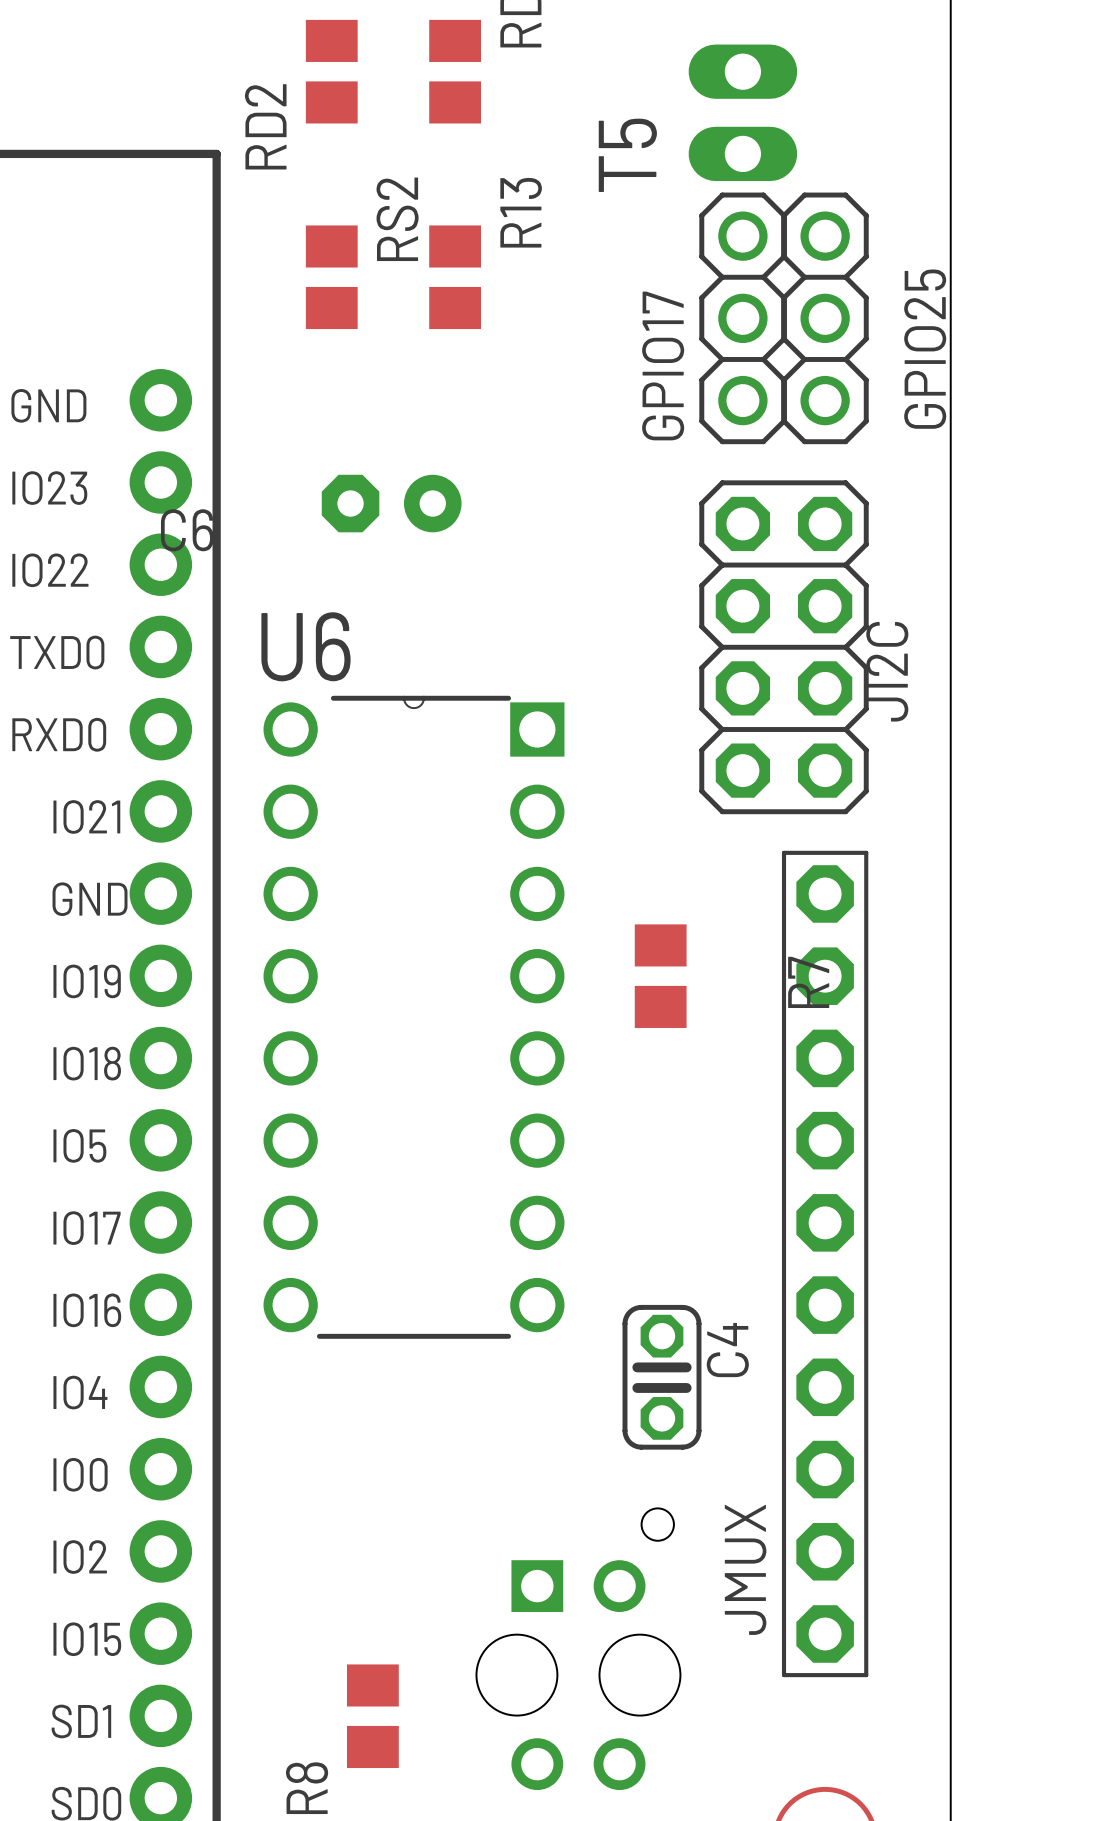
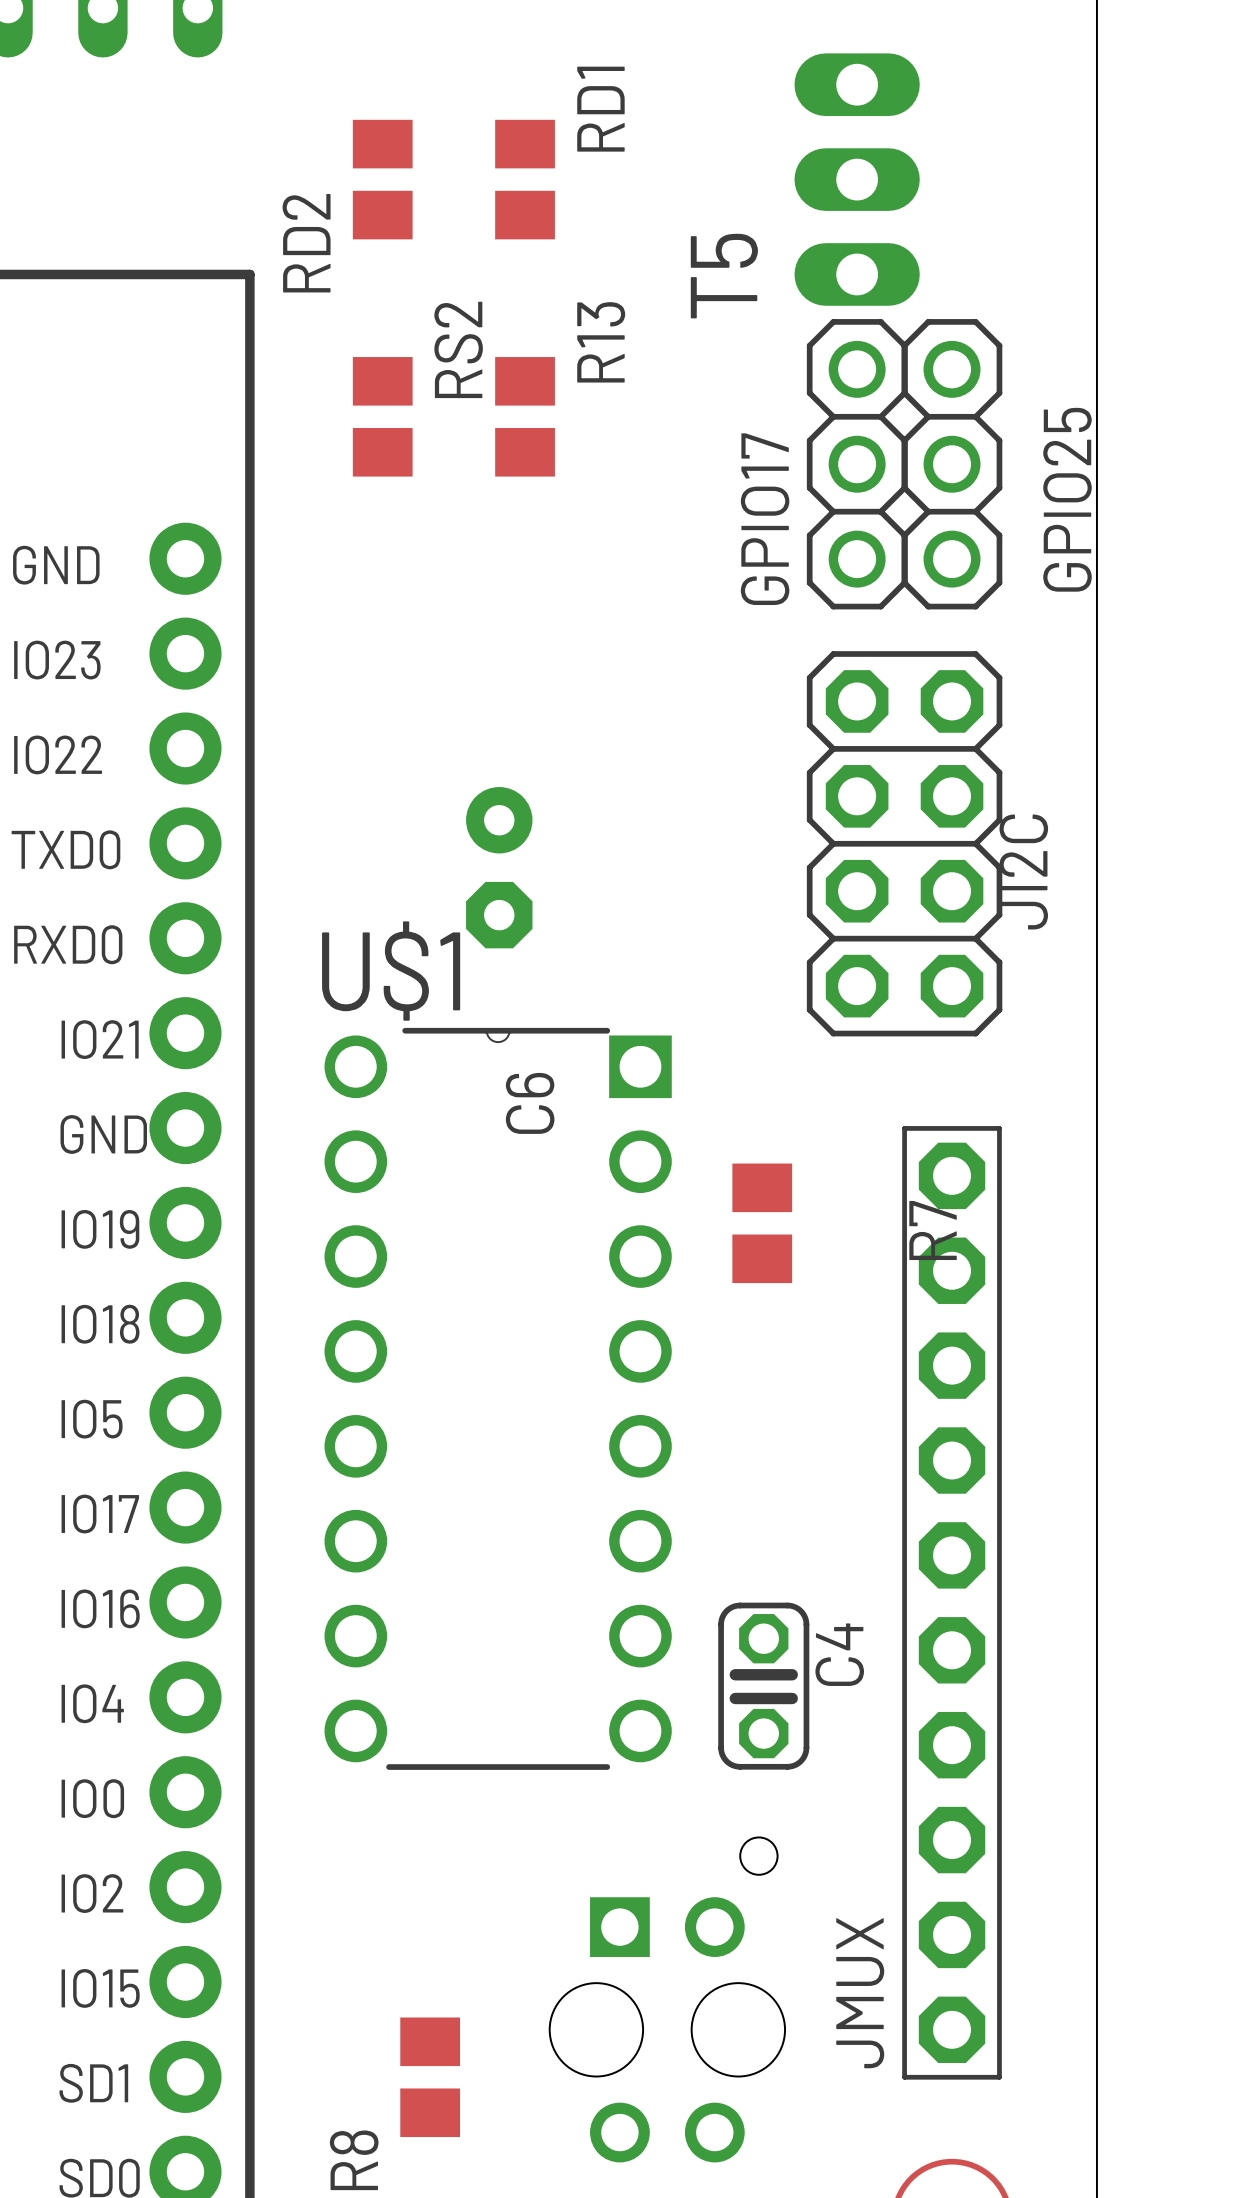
C6 rotation: 0° (391, 503) -> 90° counterclockwise (499, 867)
C6 position: (391, 503) -> (499, 867)
U6: (413, 1017) -> none
U$1: none -> (498, 1398)
JMUX position: (825, 1263) -> (952, 1602)
JMUX name position: JMUX (745, 1569) -> JMUX (860, 1993)

